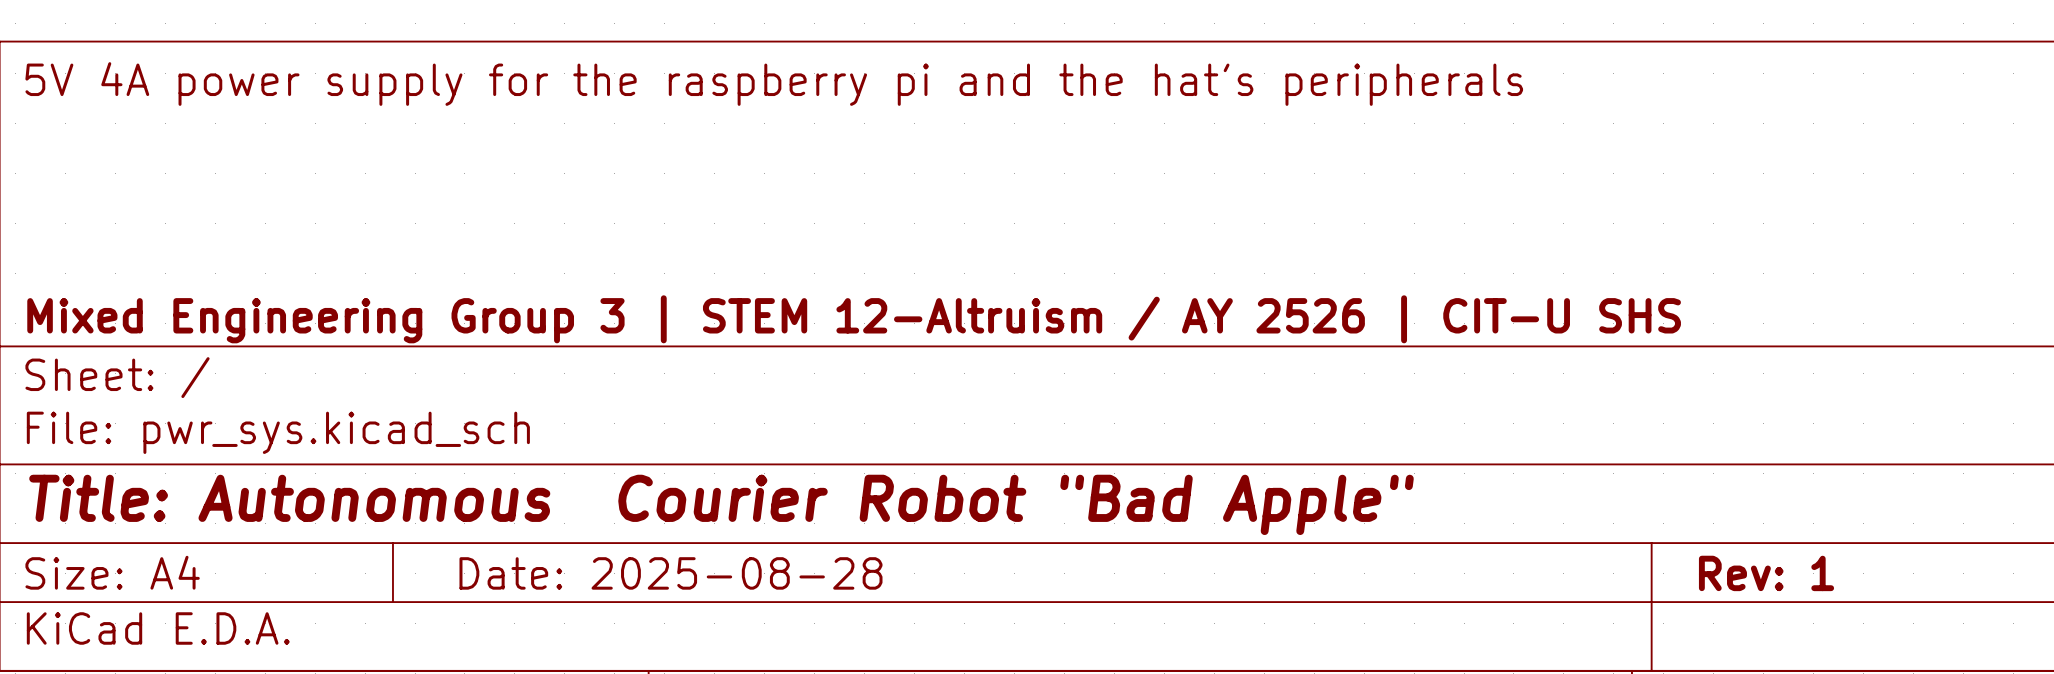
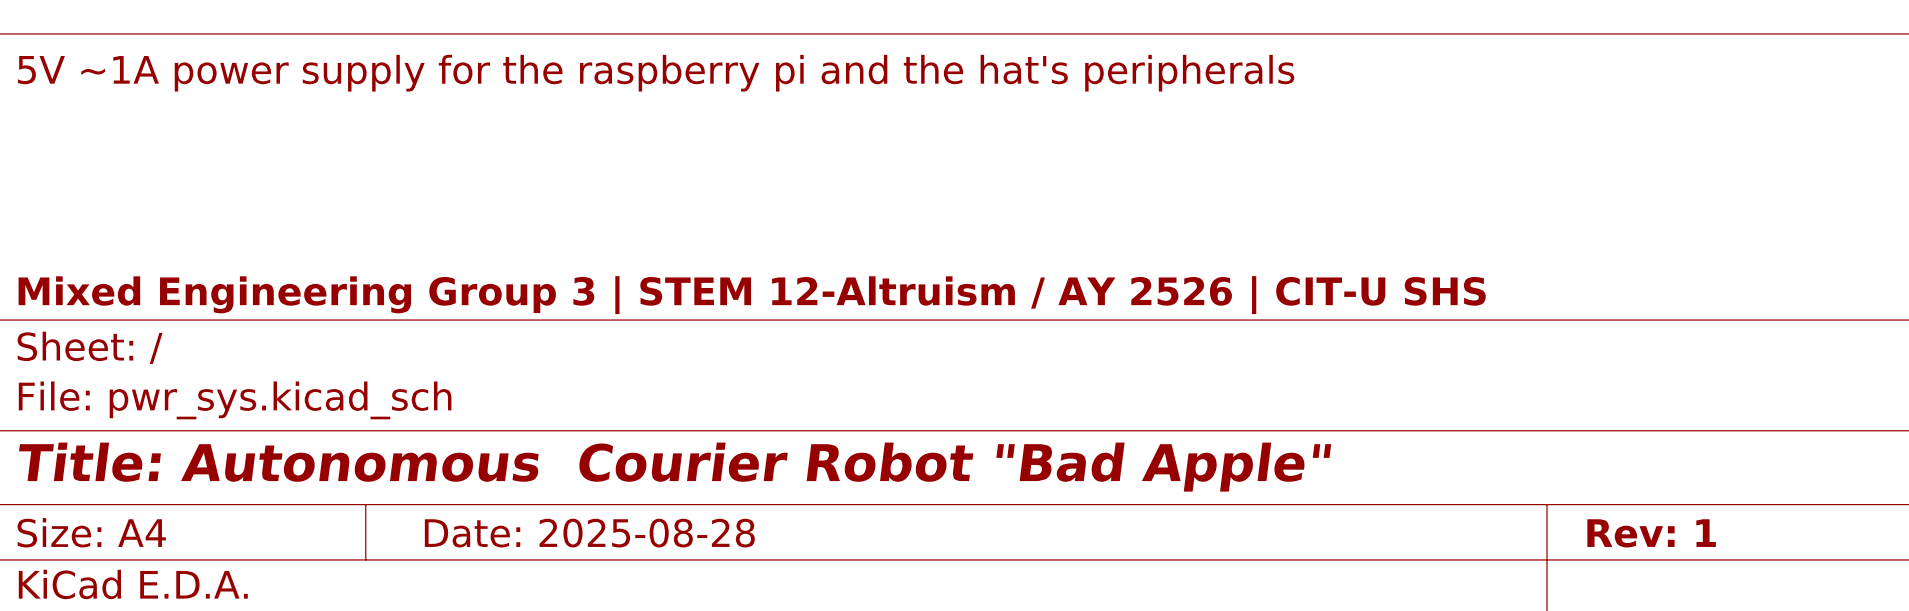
title block: 5V 4A power supply for the raspberry pi and the hat's peripherals (774, 84) -> 5V ~1A power supply for the raspberry pi and the hat's peripherals (656, 73)

